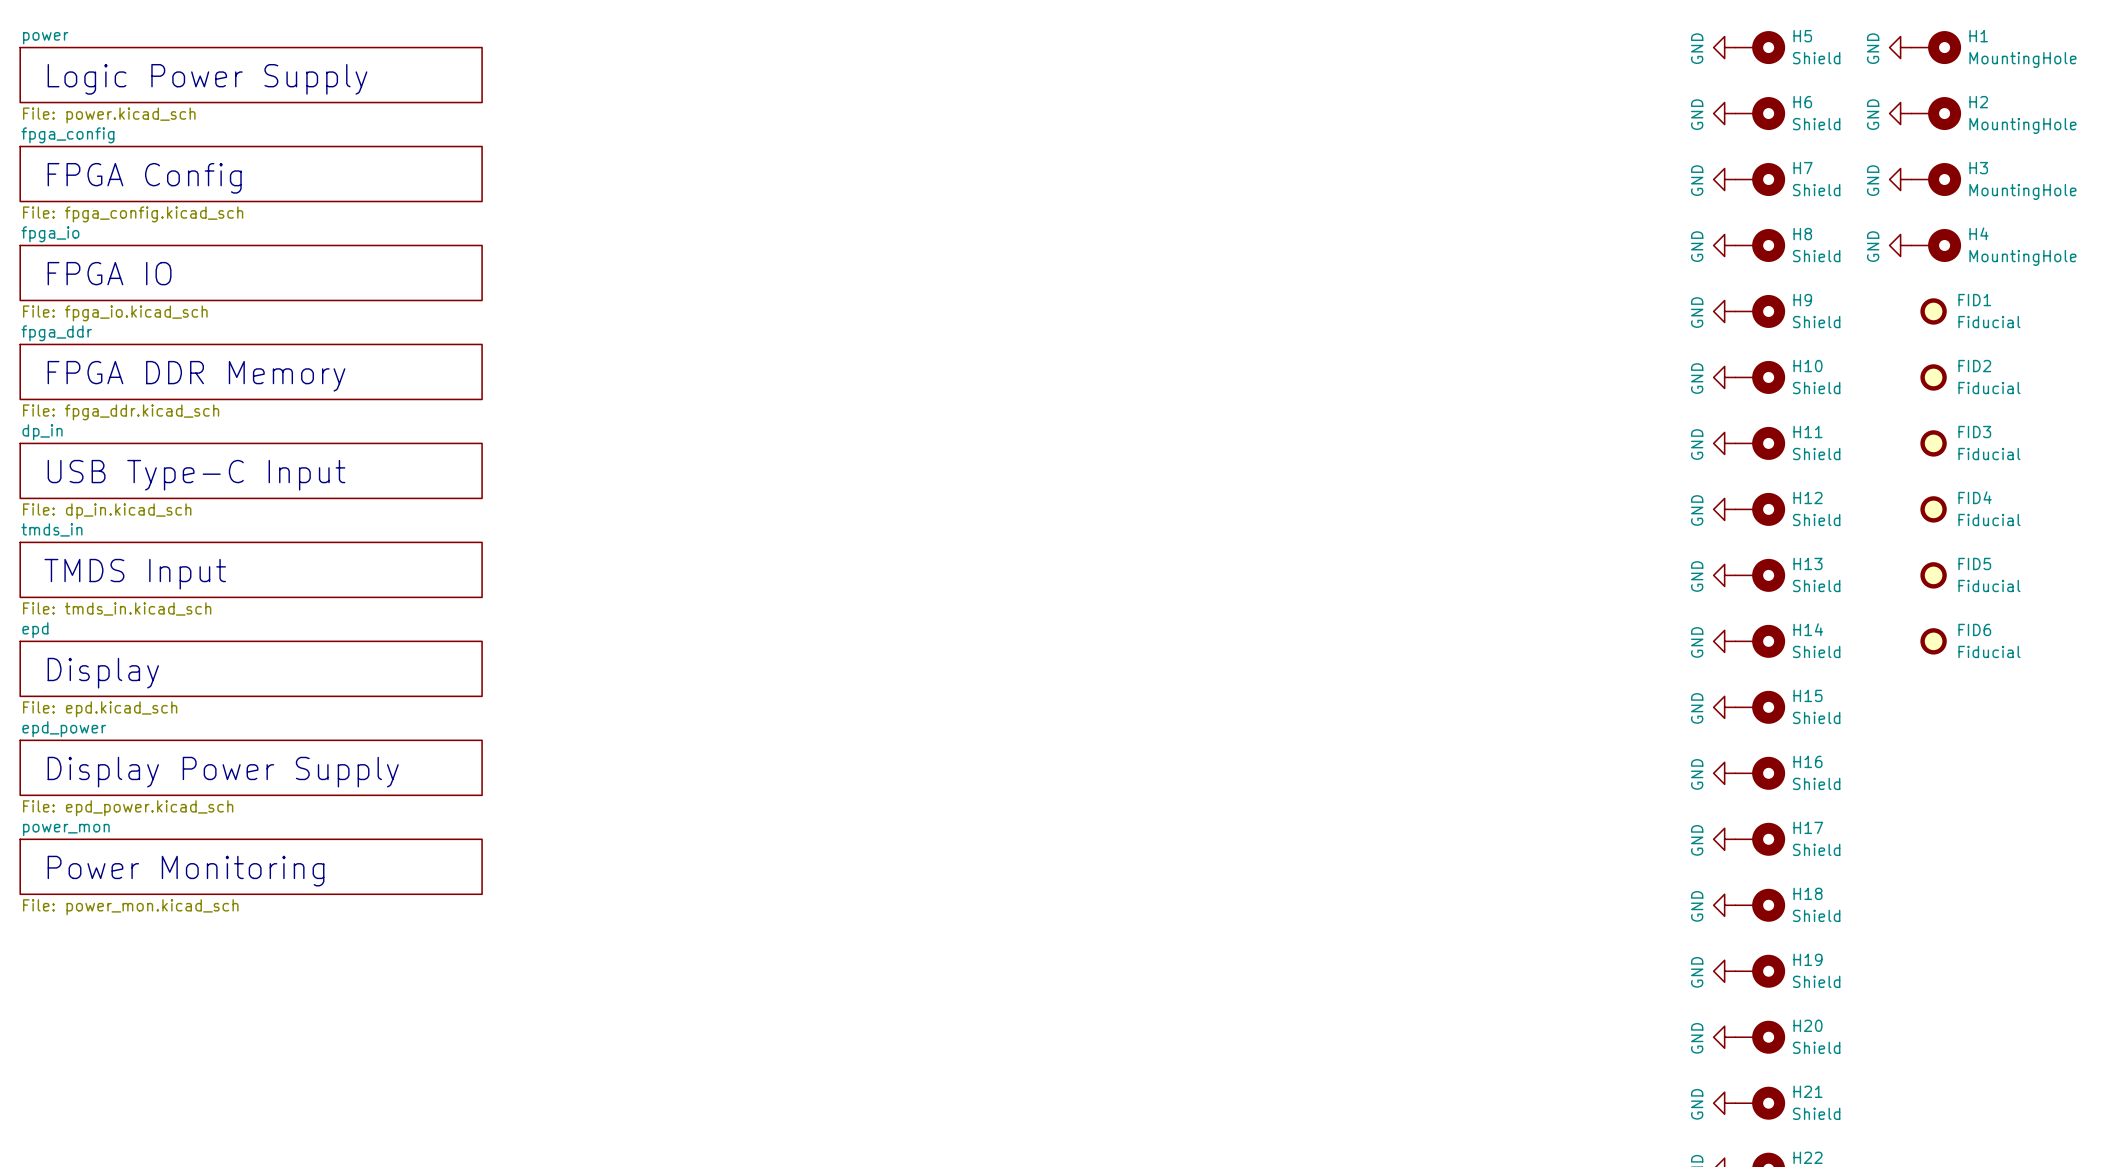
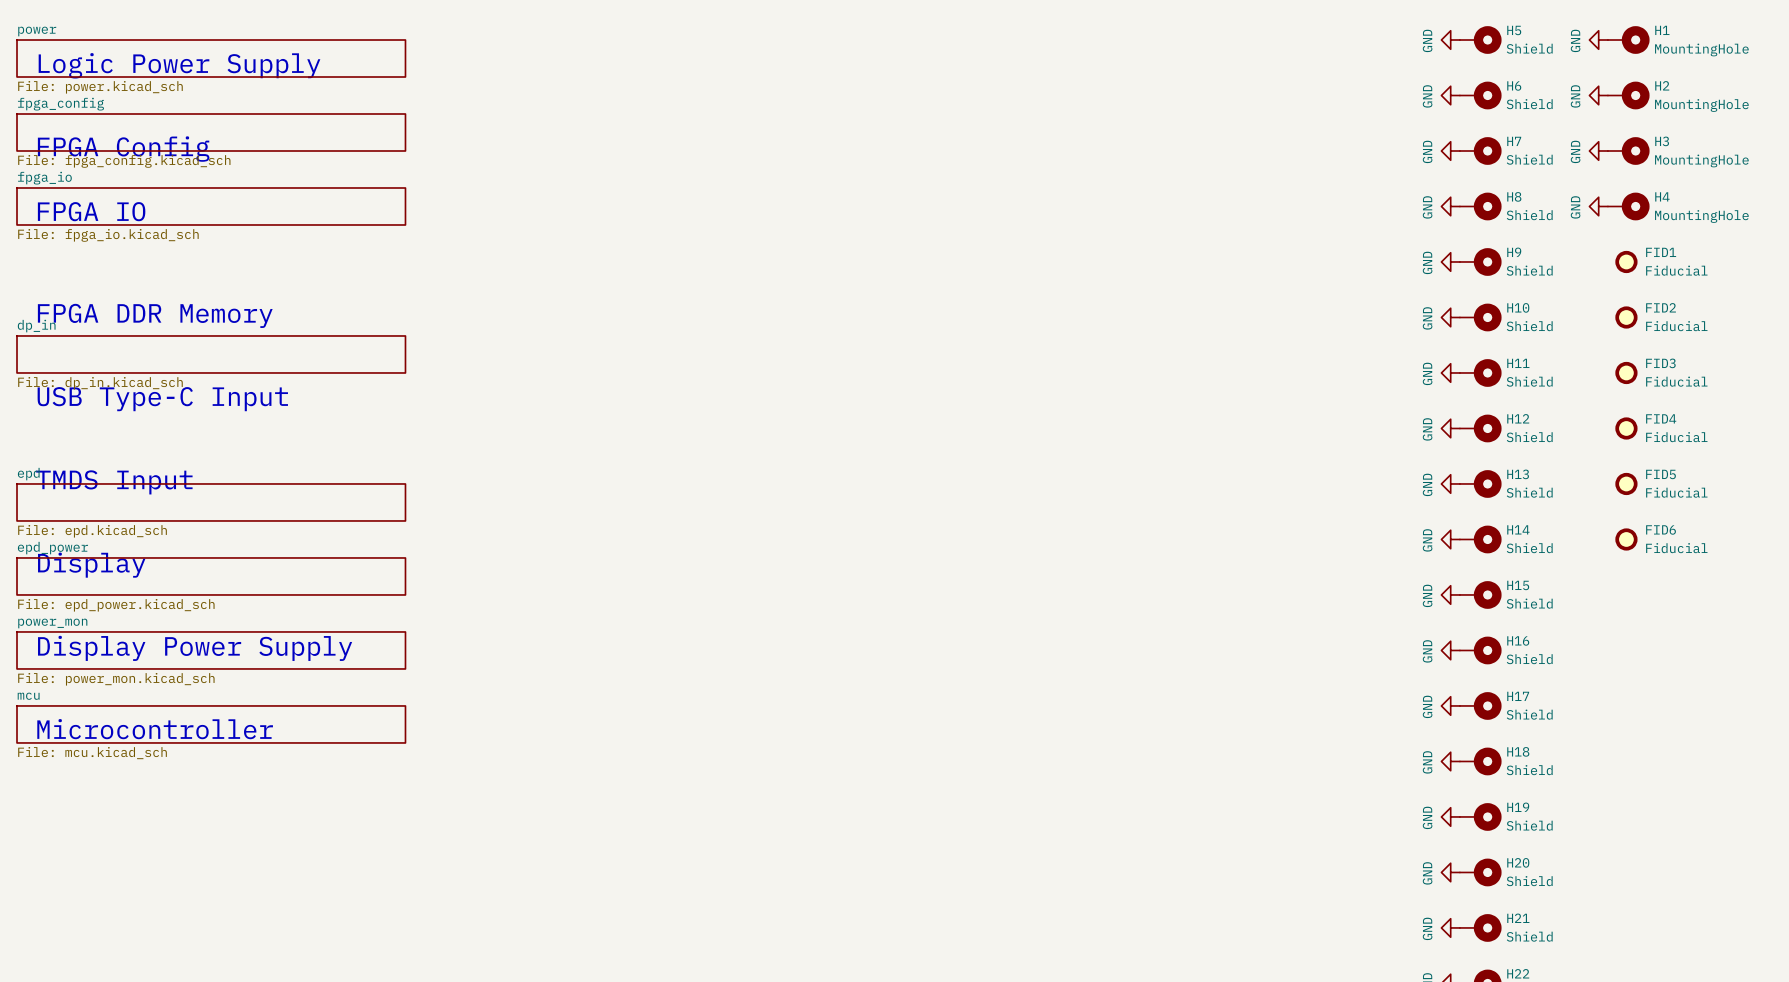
sheet power shape: [19, 46, 483, 104] -> [16, 39, 407, 78]
sheet fpga_config: none -> File: fpga_config.kicad_sch (211, 132)
sheet fpga_config: File: fpga_config.kicad_sch (251, 174) -> none
sheet fpga_io: none -> File: fpga_io.kicad_sch (211, 206)
sheet fpga_io: File: fpga_io.kicad_sch (251, 272) -> none
text position: FPGA IO (109, 273) -> FPGA IO (91, 211)
sheet fpga_ddr: File: fpga_ddr.kicad_sch (251, 371) -> none
sheet dp_in: none -> File: dp_in.kicad_sch (211, 354)
sheet dp_in: File: dp_in.kicad_sch (251, 470) -> none
sheet tmds_in: File: tmds_in.kicad_sch (251, 569) -> none
sheet epd: none -> File: epd.kicad_sch (211, 502)
sheet epd: File: epd.kicad_sch (251, 668) -> none
sheet epd_power: none -> File: epd_power.kicad_sch (211, 576)
sheet epd_power: File: epd_power.kicad_sch (251, 767) -> none
sheet power_mon: none -> File: power_mon.kicad_sch (211, 650)
sheet mcu: none -> File: mcu.kicad_sch (211, 724)
sheet power_mon: File: power_mon.kicad_sch (251, 866) -> none
text: Power Monitoring (186, 871) -> Microcontroller (155, 729)

